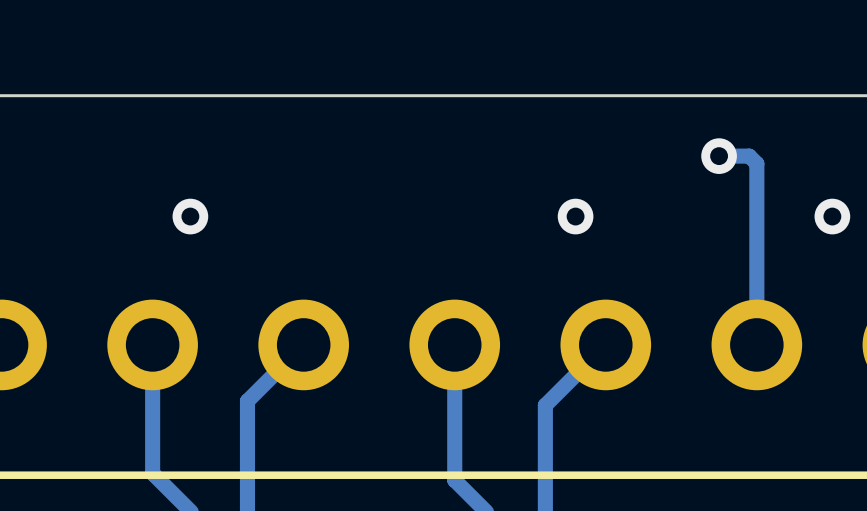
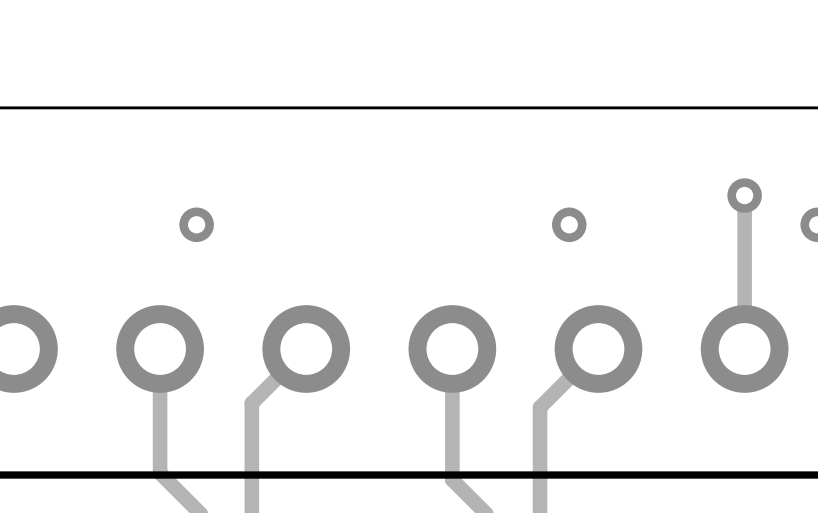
track: (719, 156) (749, 156) (756, 163) (756, 186) -> none
via position: (719, 156) -> (744, 195)

